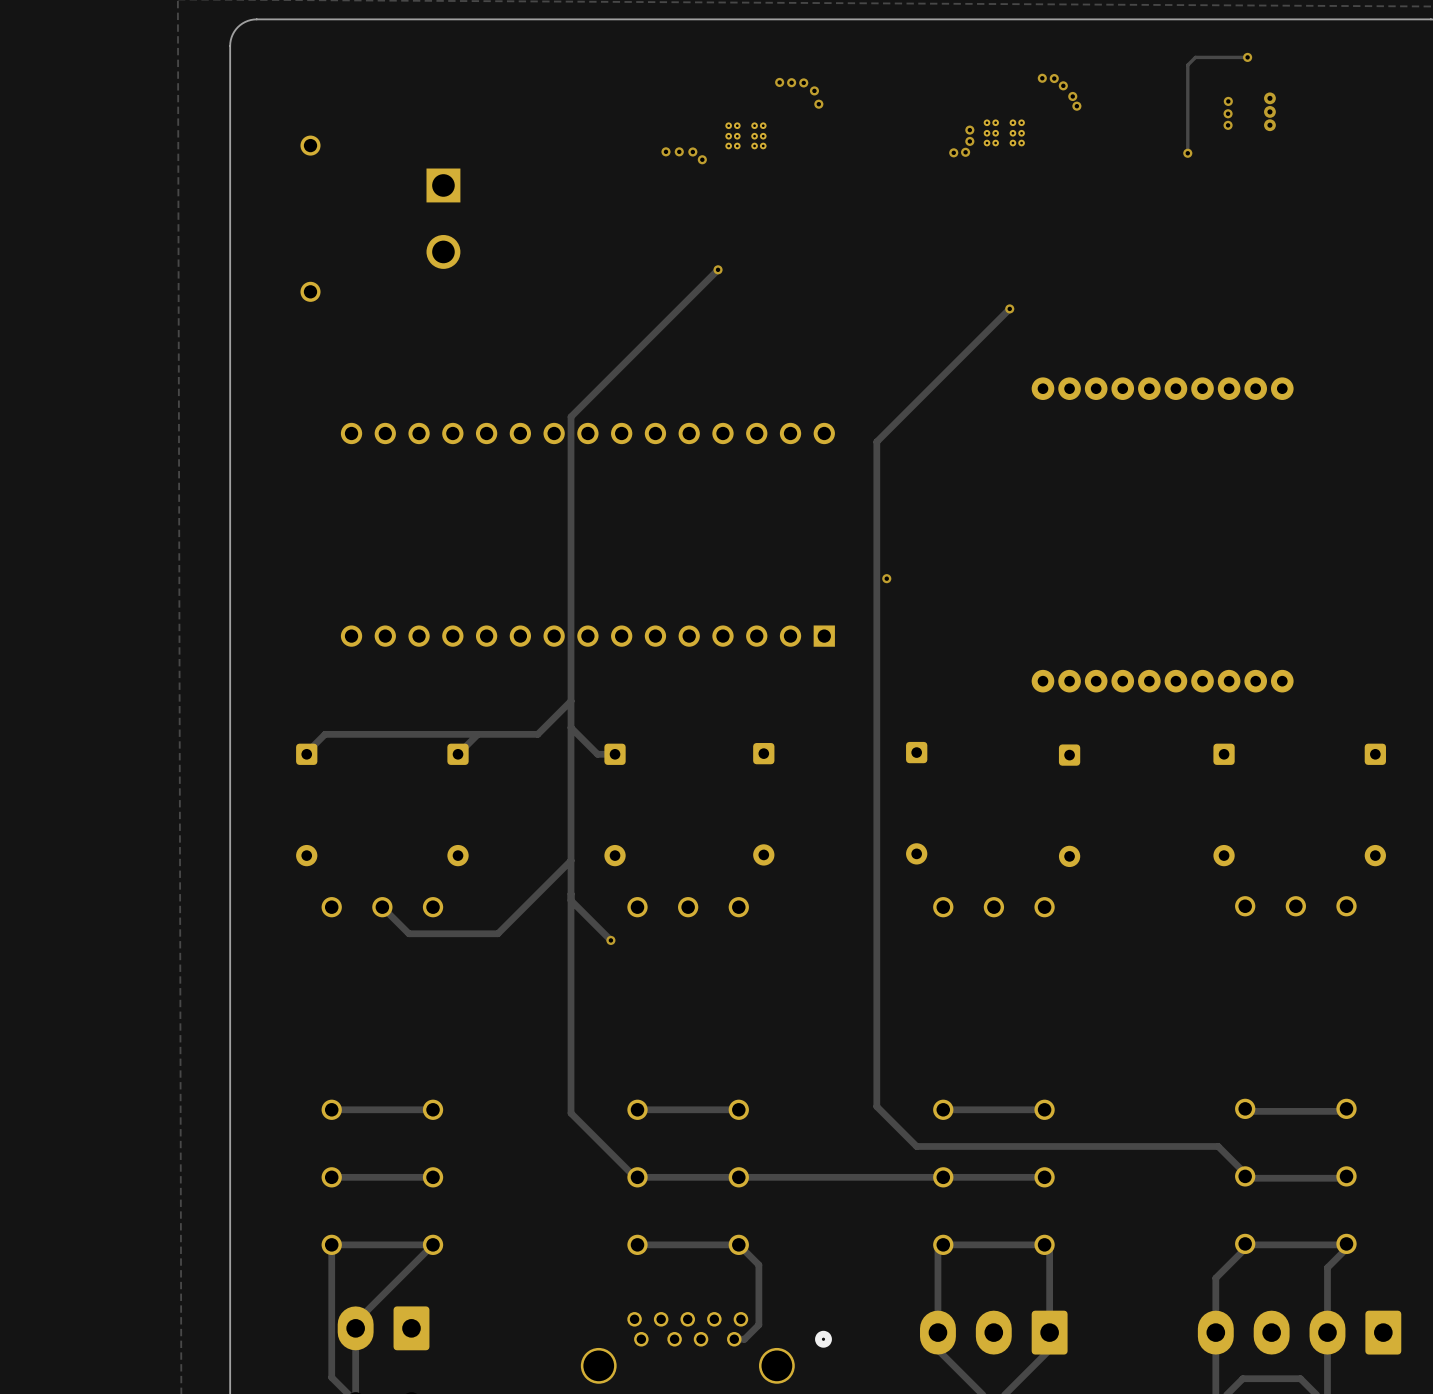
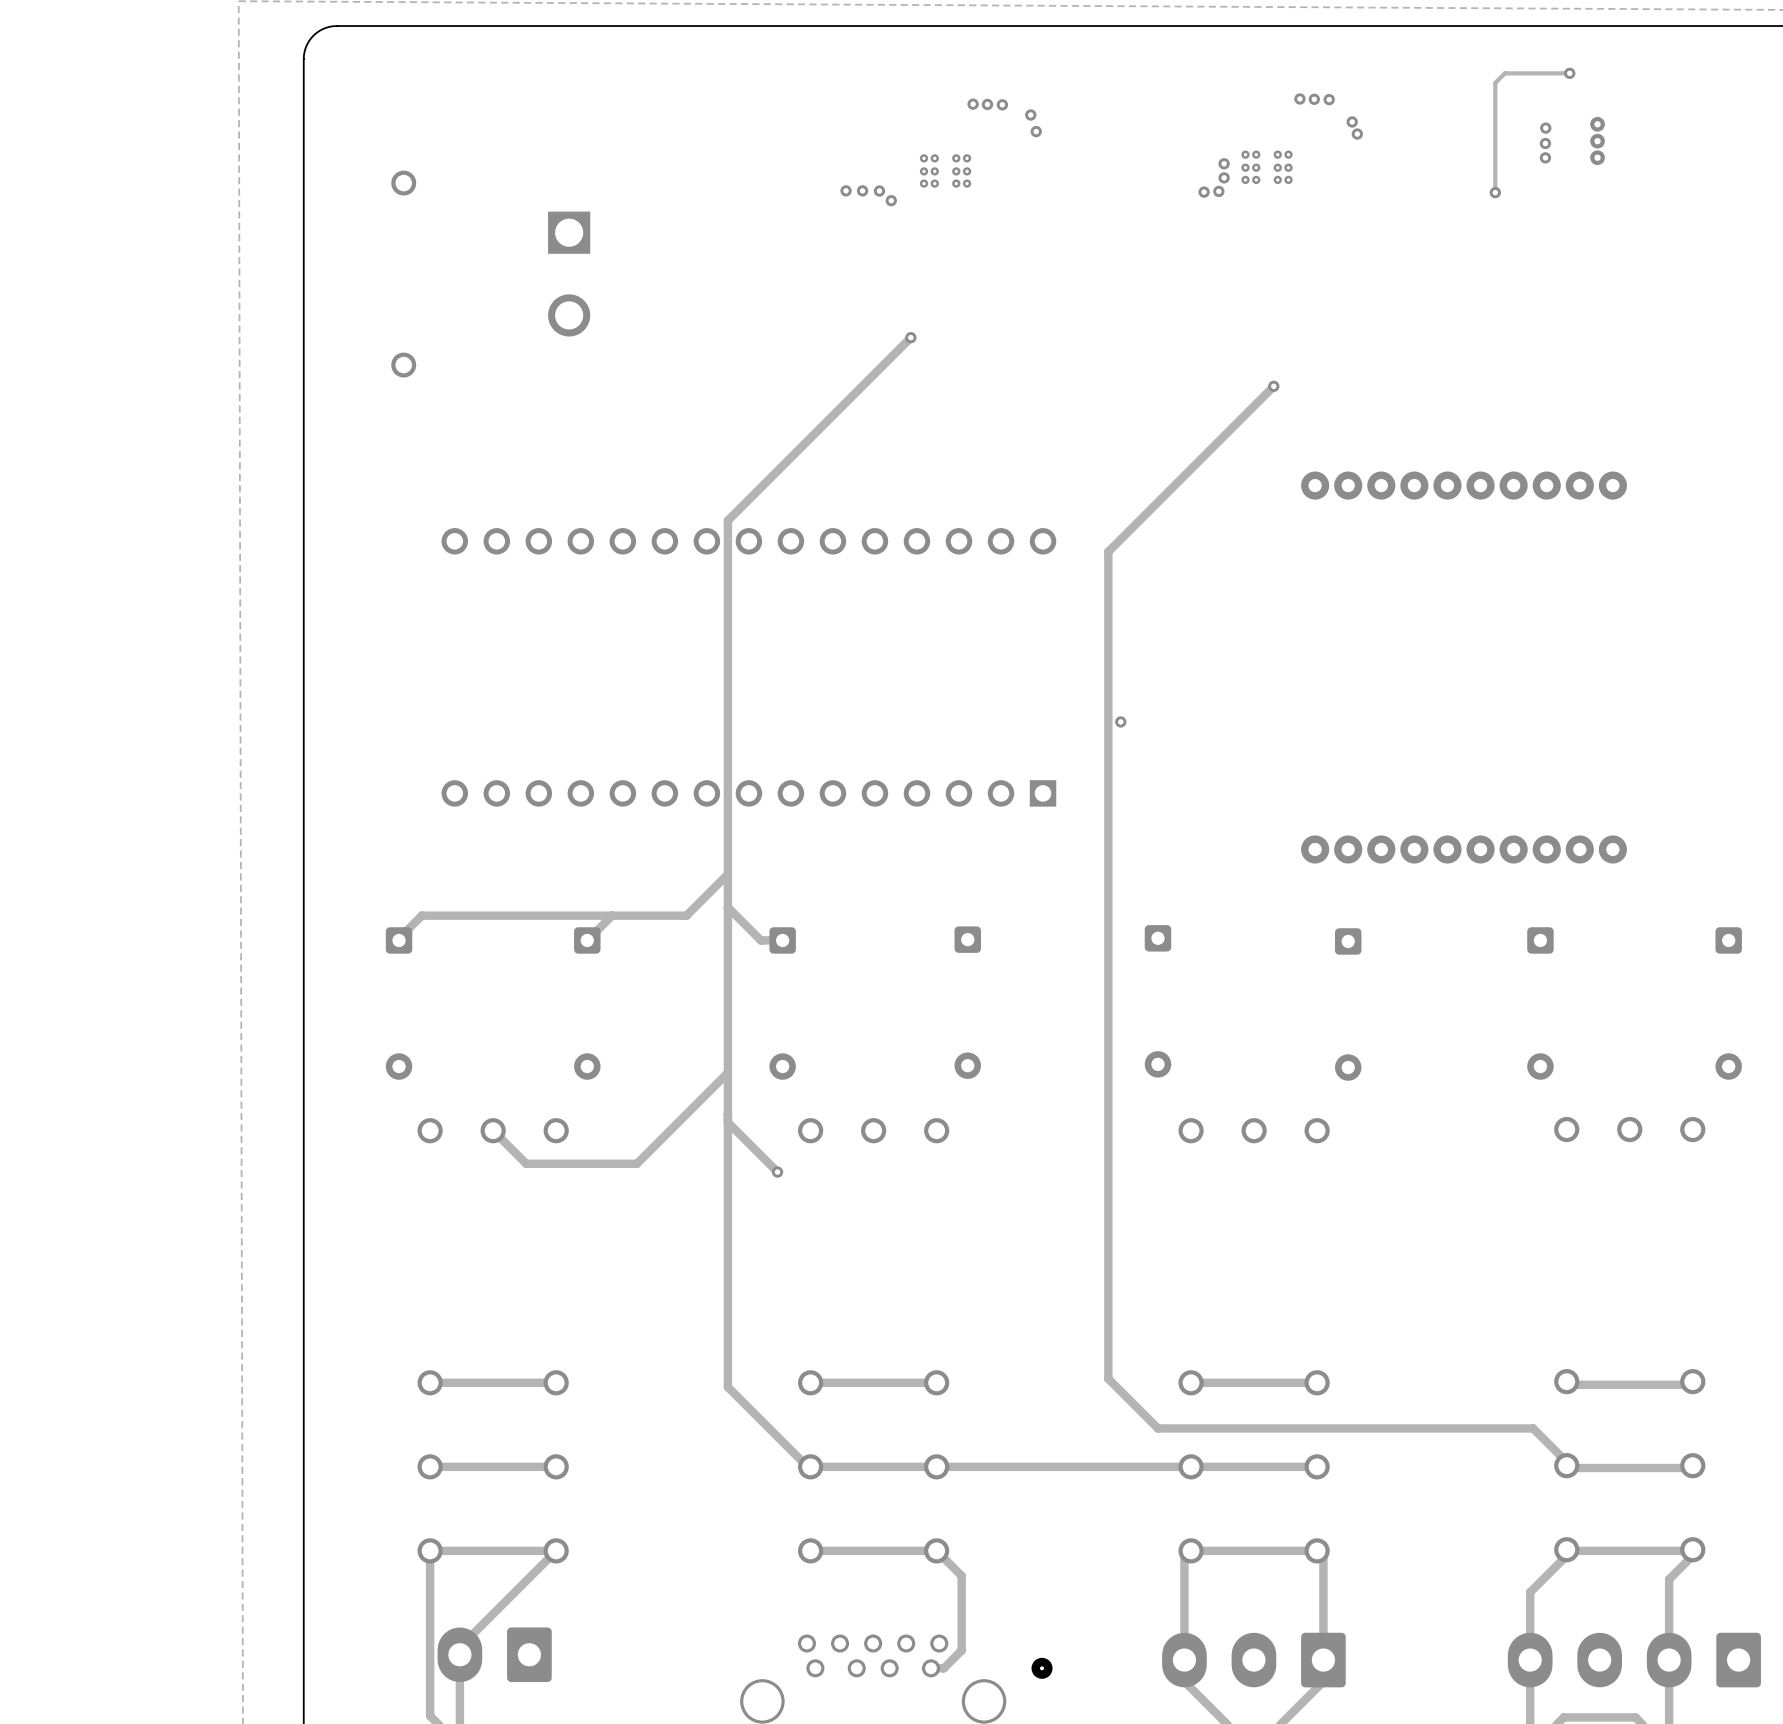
via position: (803, 82) -> (973, 104)
via position: (1063, 85) -> (1299, 98)

